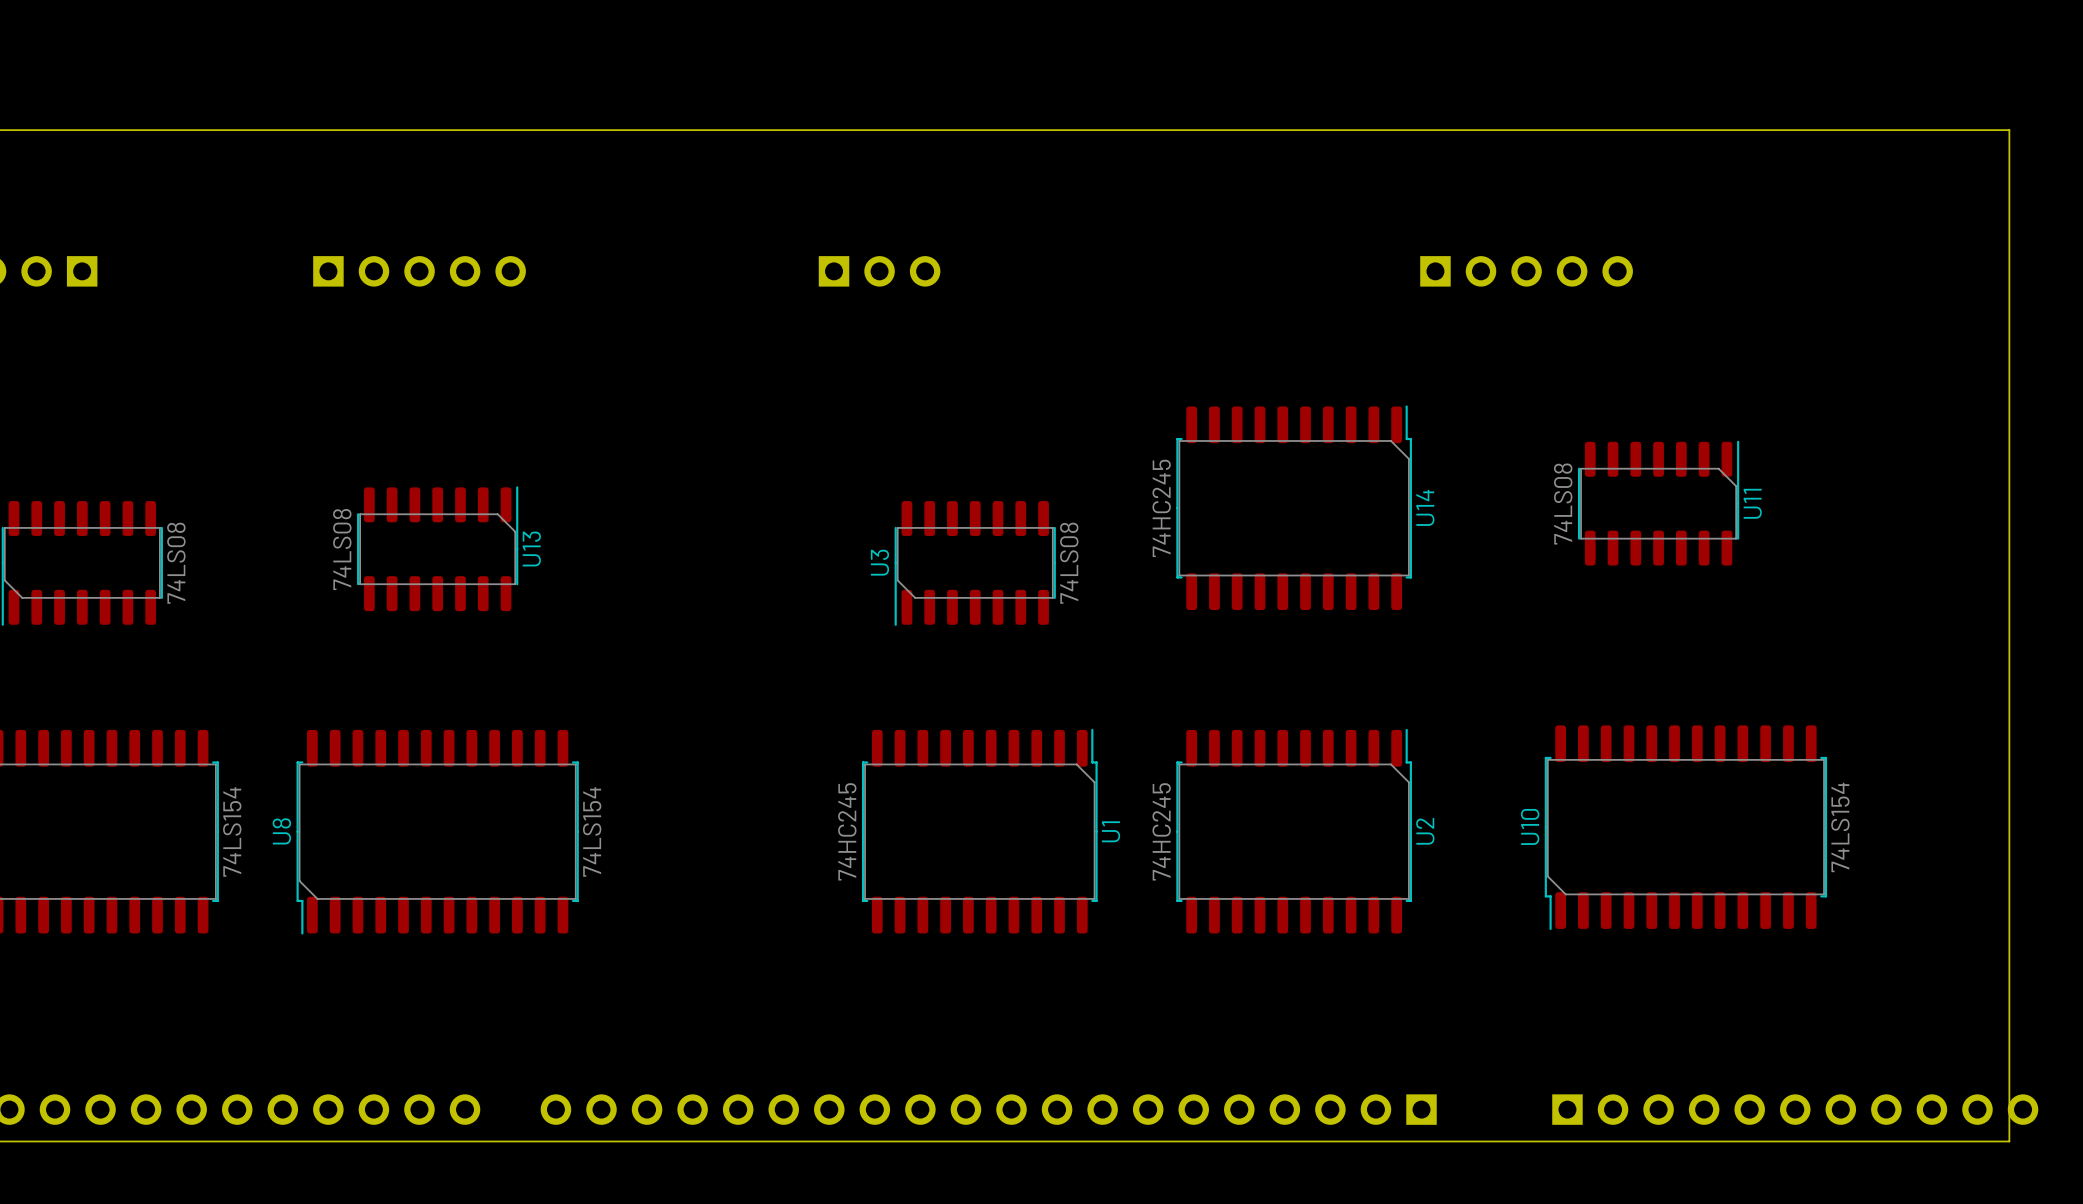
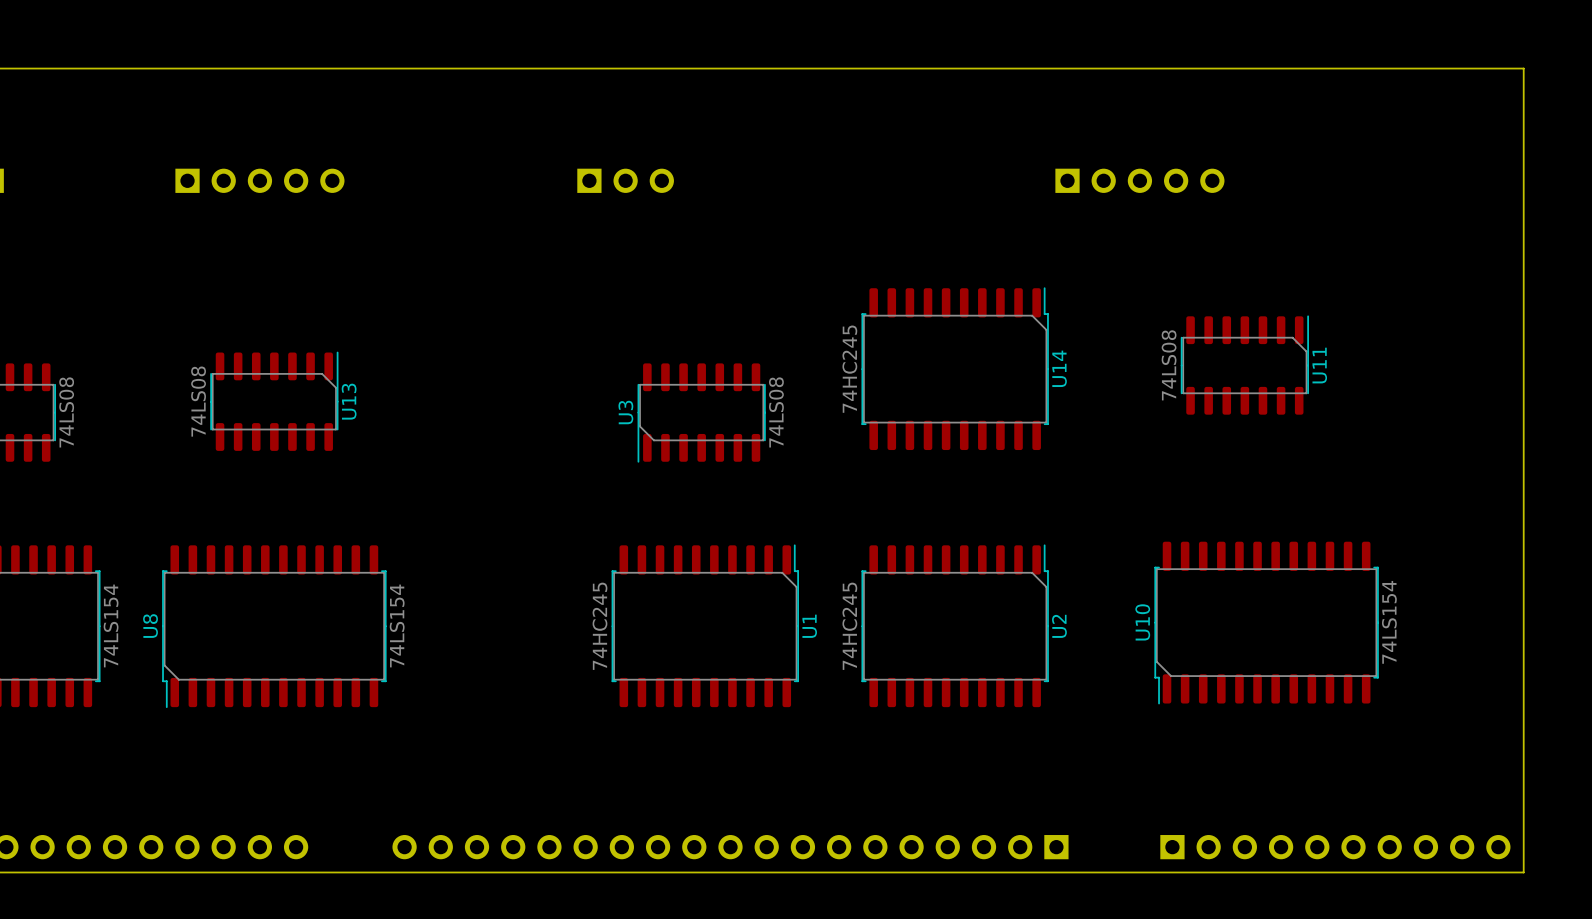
part: (988, 1109) -> none
part: (1795, 1109) -> none

